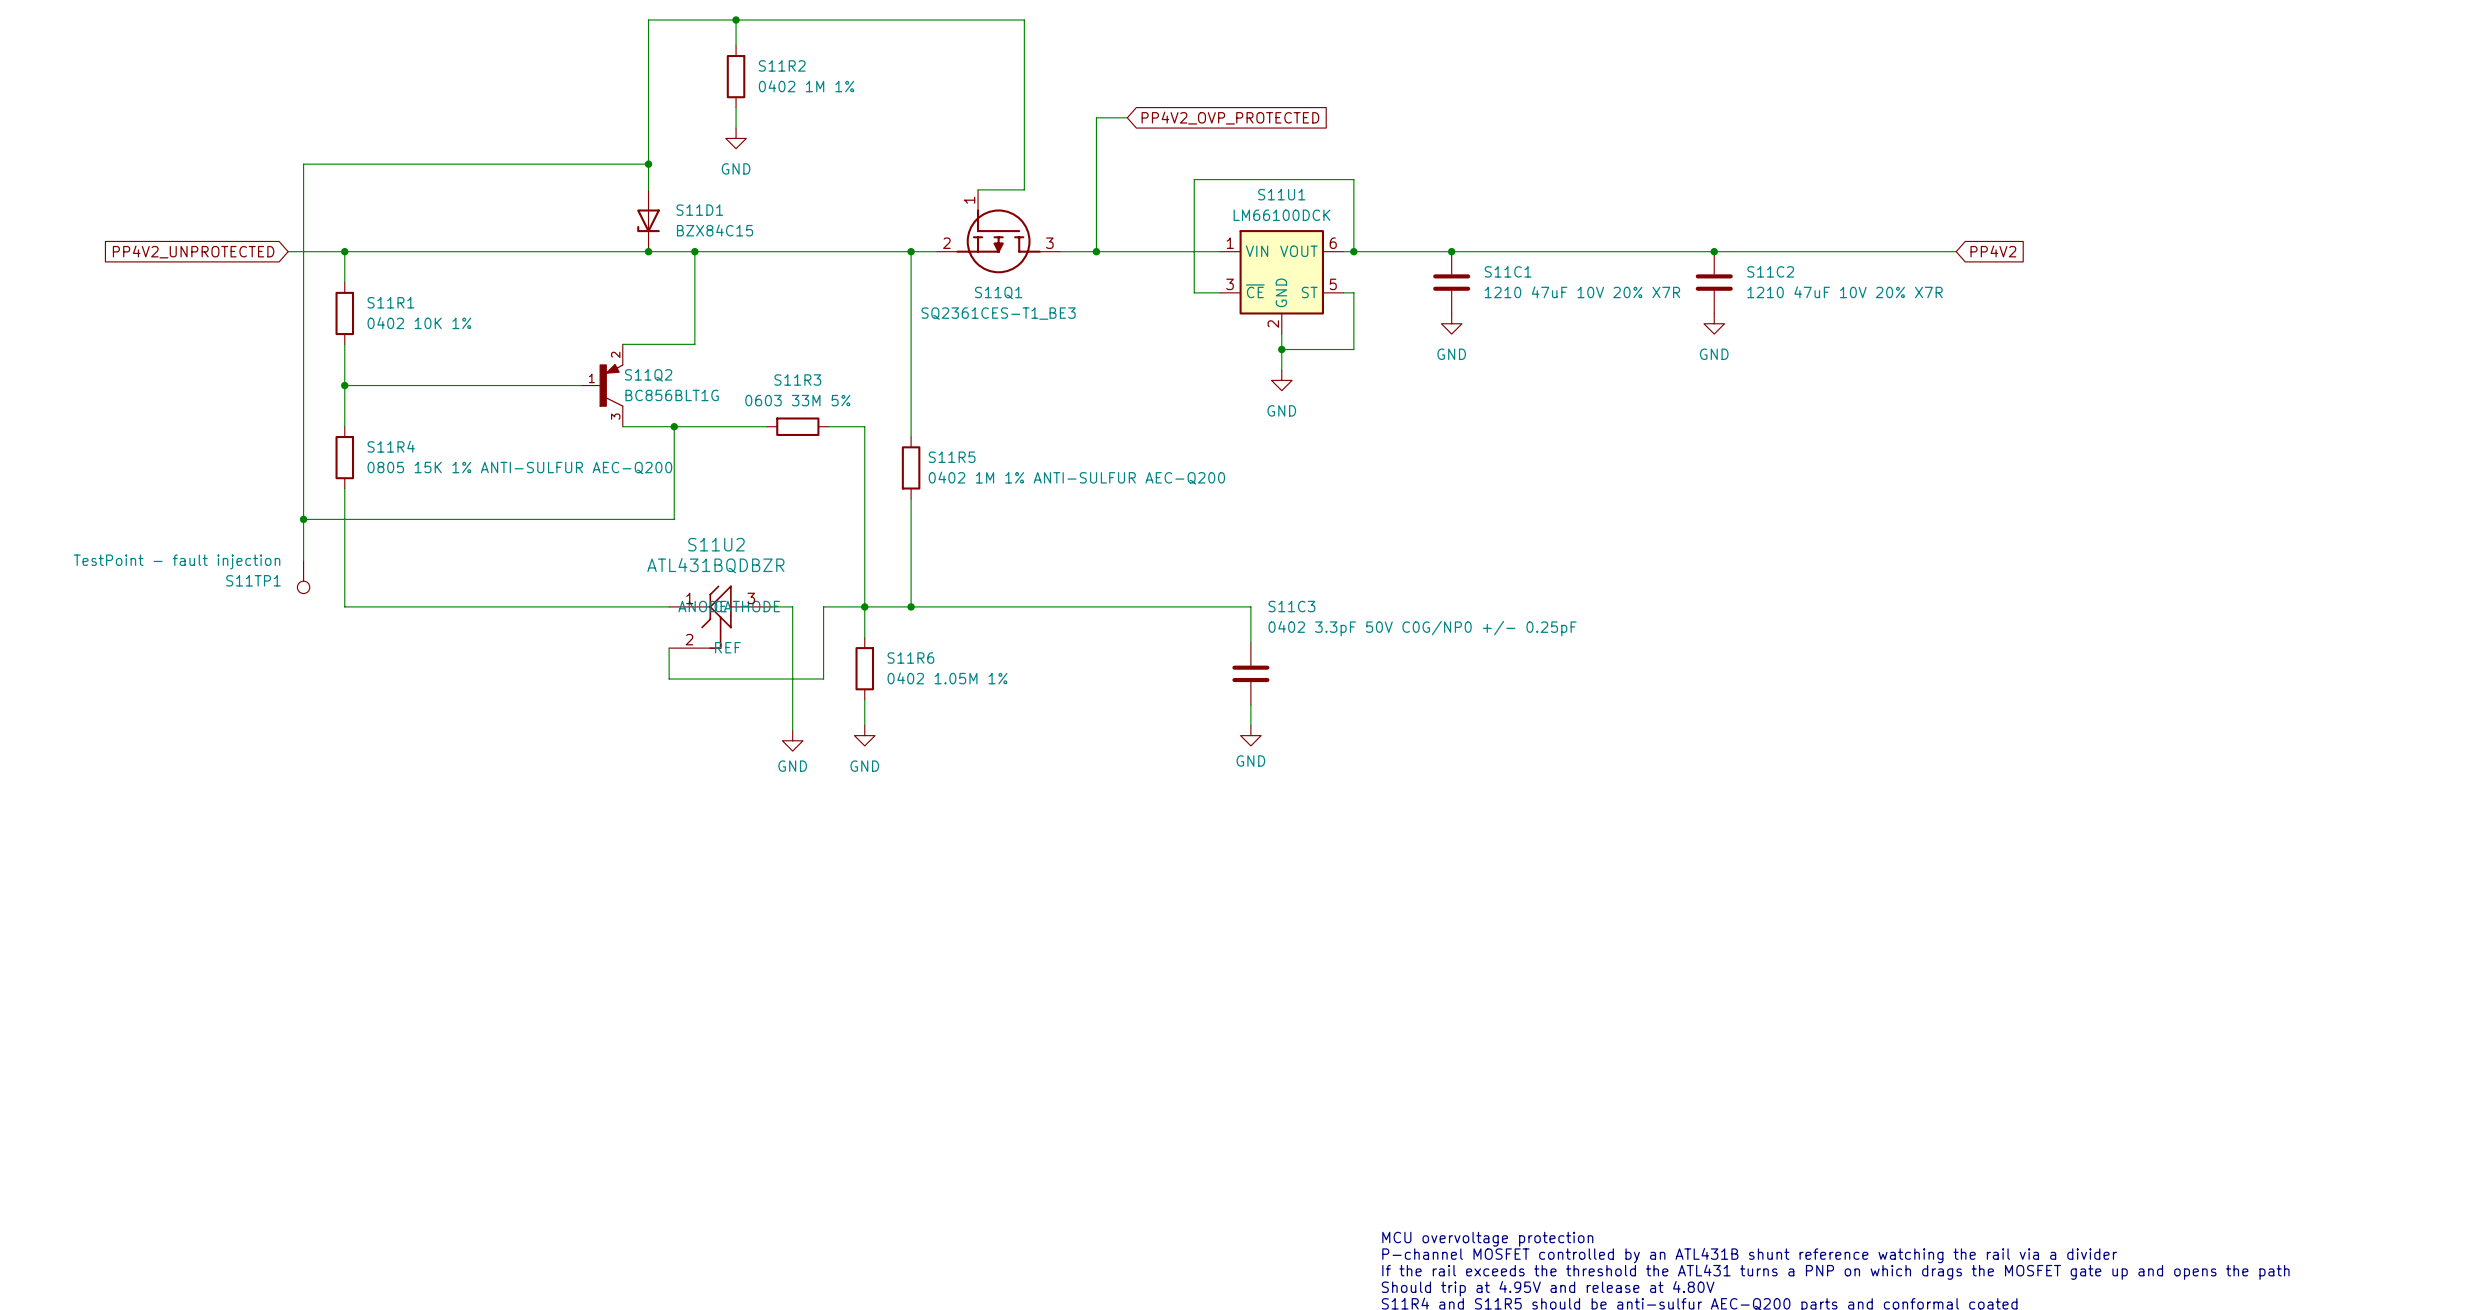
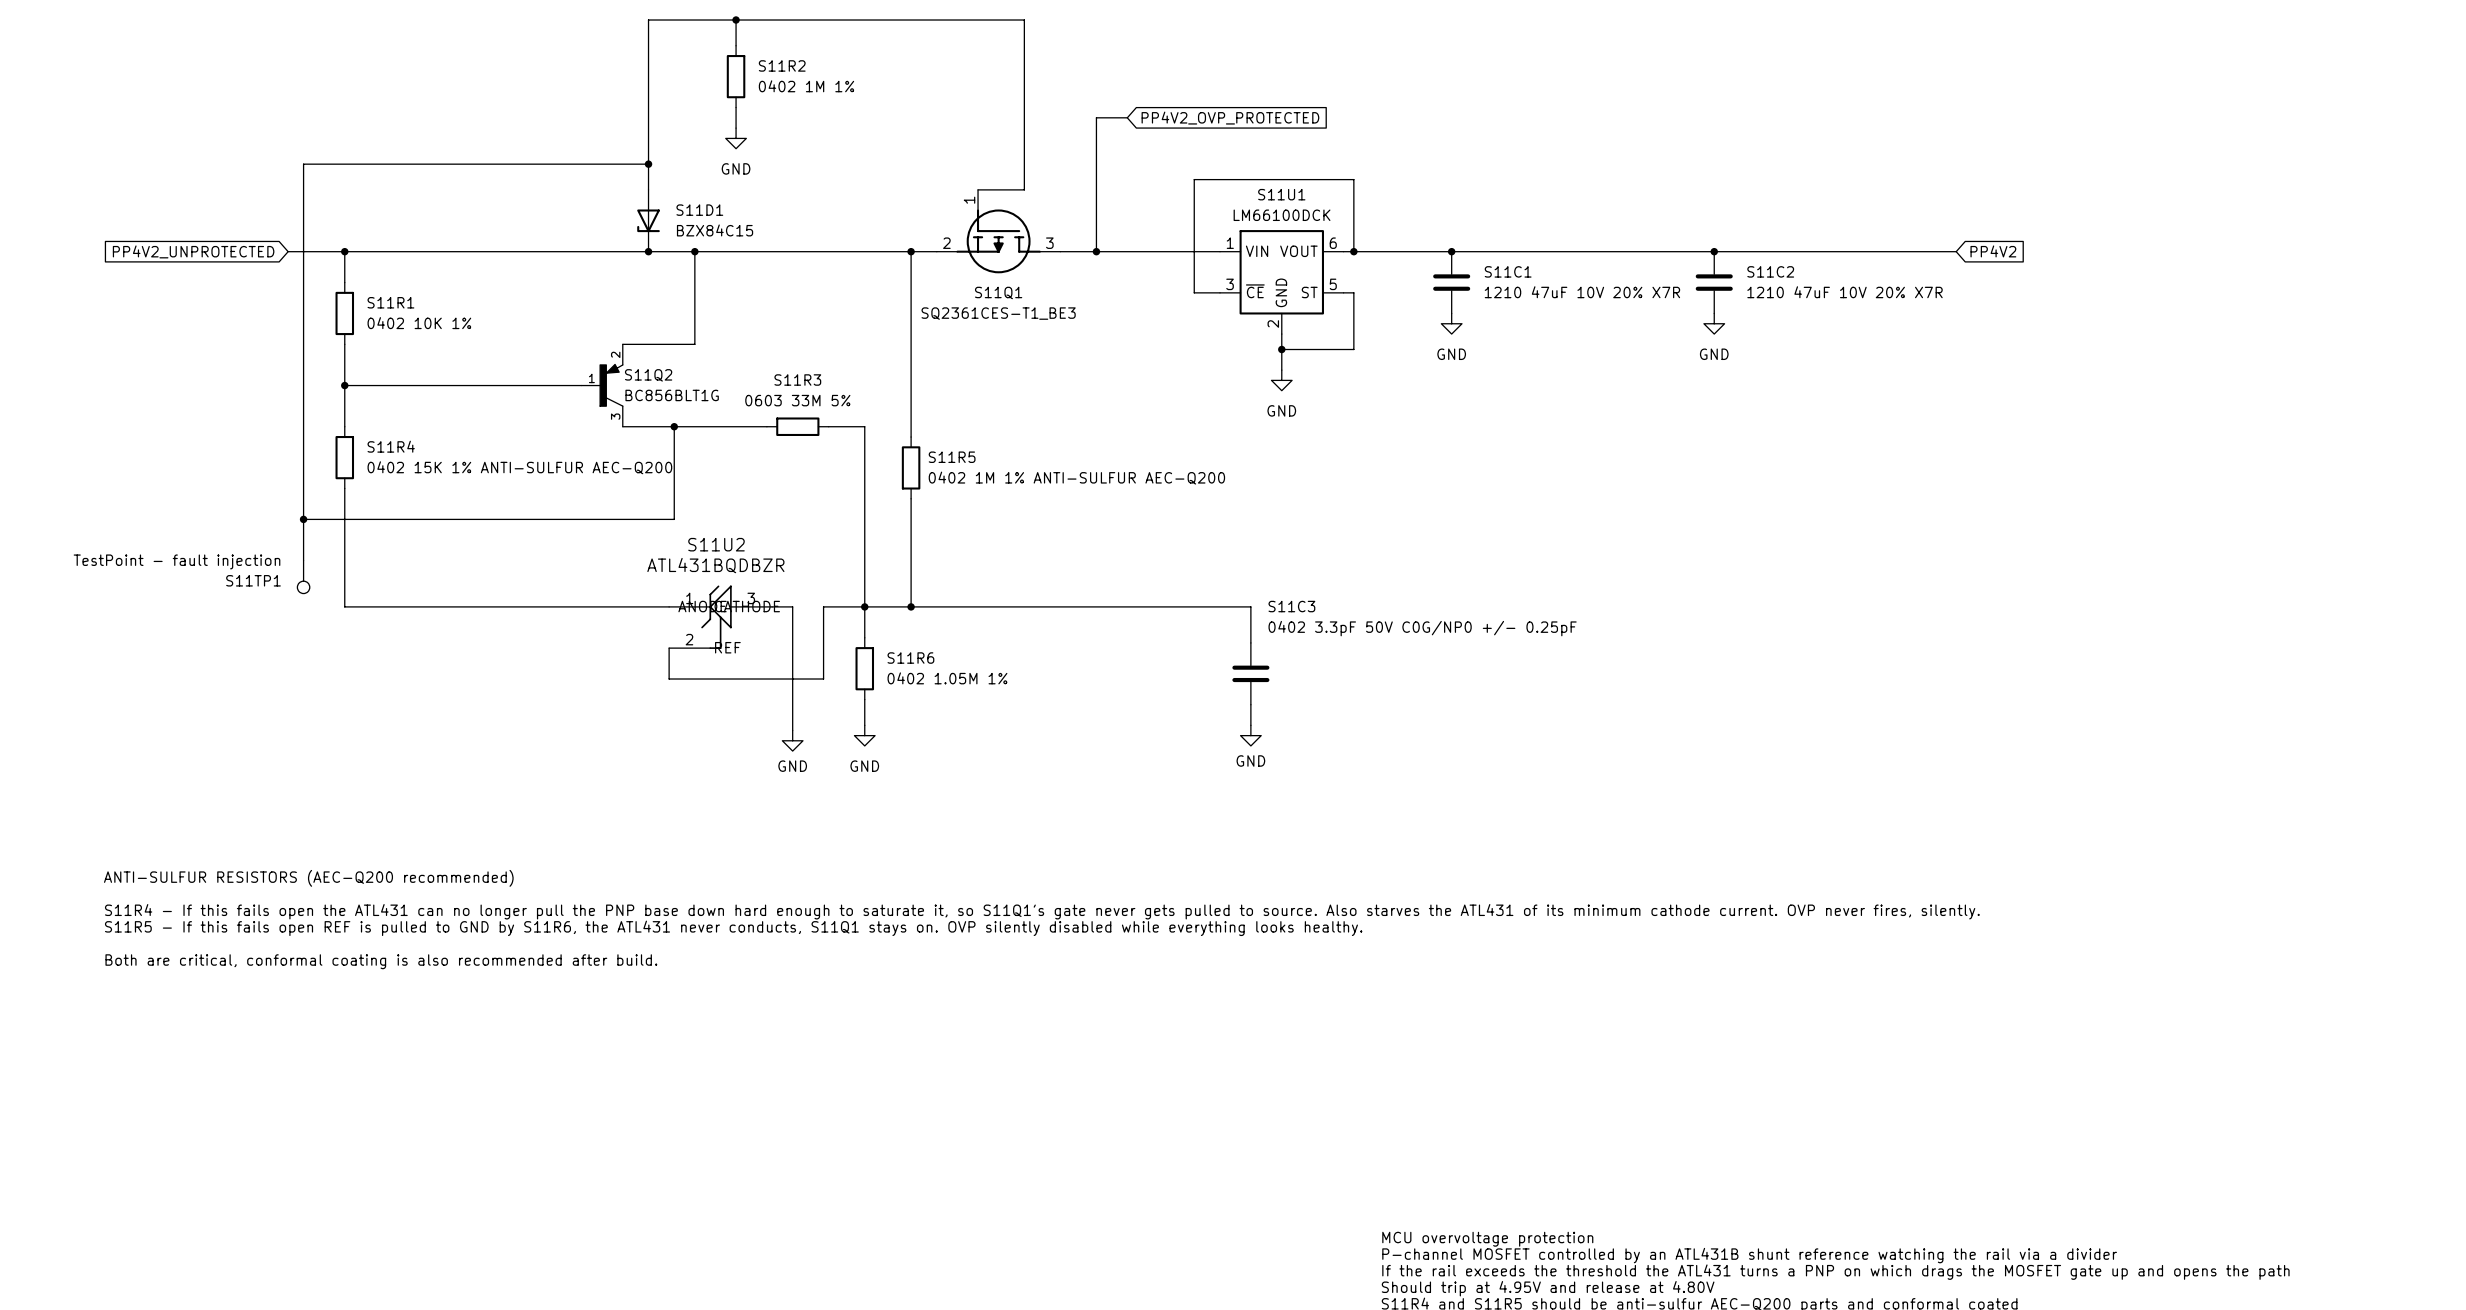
S11R4 value: 0805 15K 1% ANTI-SULFUR AEC-Q200 (519, 468) -> 0402 15K 1% ANTI-SULFUR AEC-Q200 (519, 467)
text: none -> ANTI-SULFUR RESISTORS (AEC-Q200 recommended) (308, 878)
text: none -> S11R4 - If this fails open the ATL431 can no longer pull the PNP base down hard enough to saturate it, so S11Q1's gate never gets pulled to source. Also starves the ATL431 of its minimum cathode current. OVP never fires, silently. (1042, 911)
text: none -> S11R5 - If this fails open REF is pulled to GND by S11R6, the ATL431 never conducts, S11Q1 stays on. OVP silently disabled while everything looks healthy. (733, 928)
text: none -> Both are critical, conformal coating is also recommended after build. (381, 961)

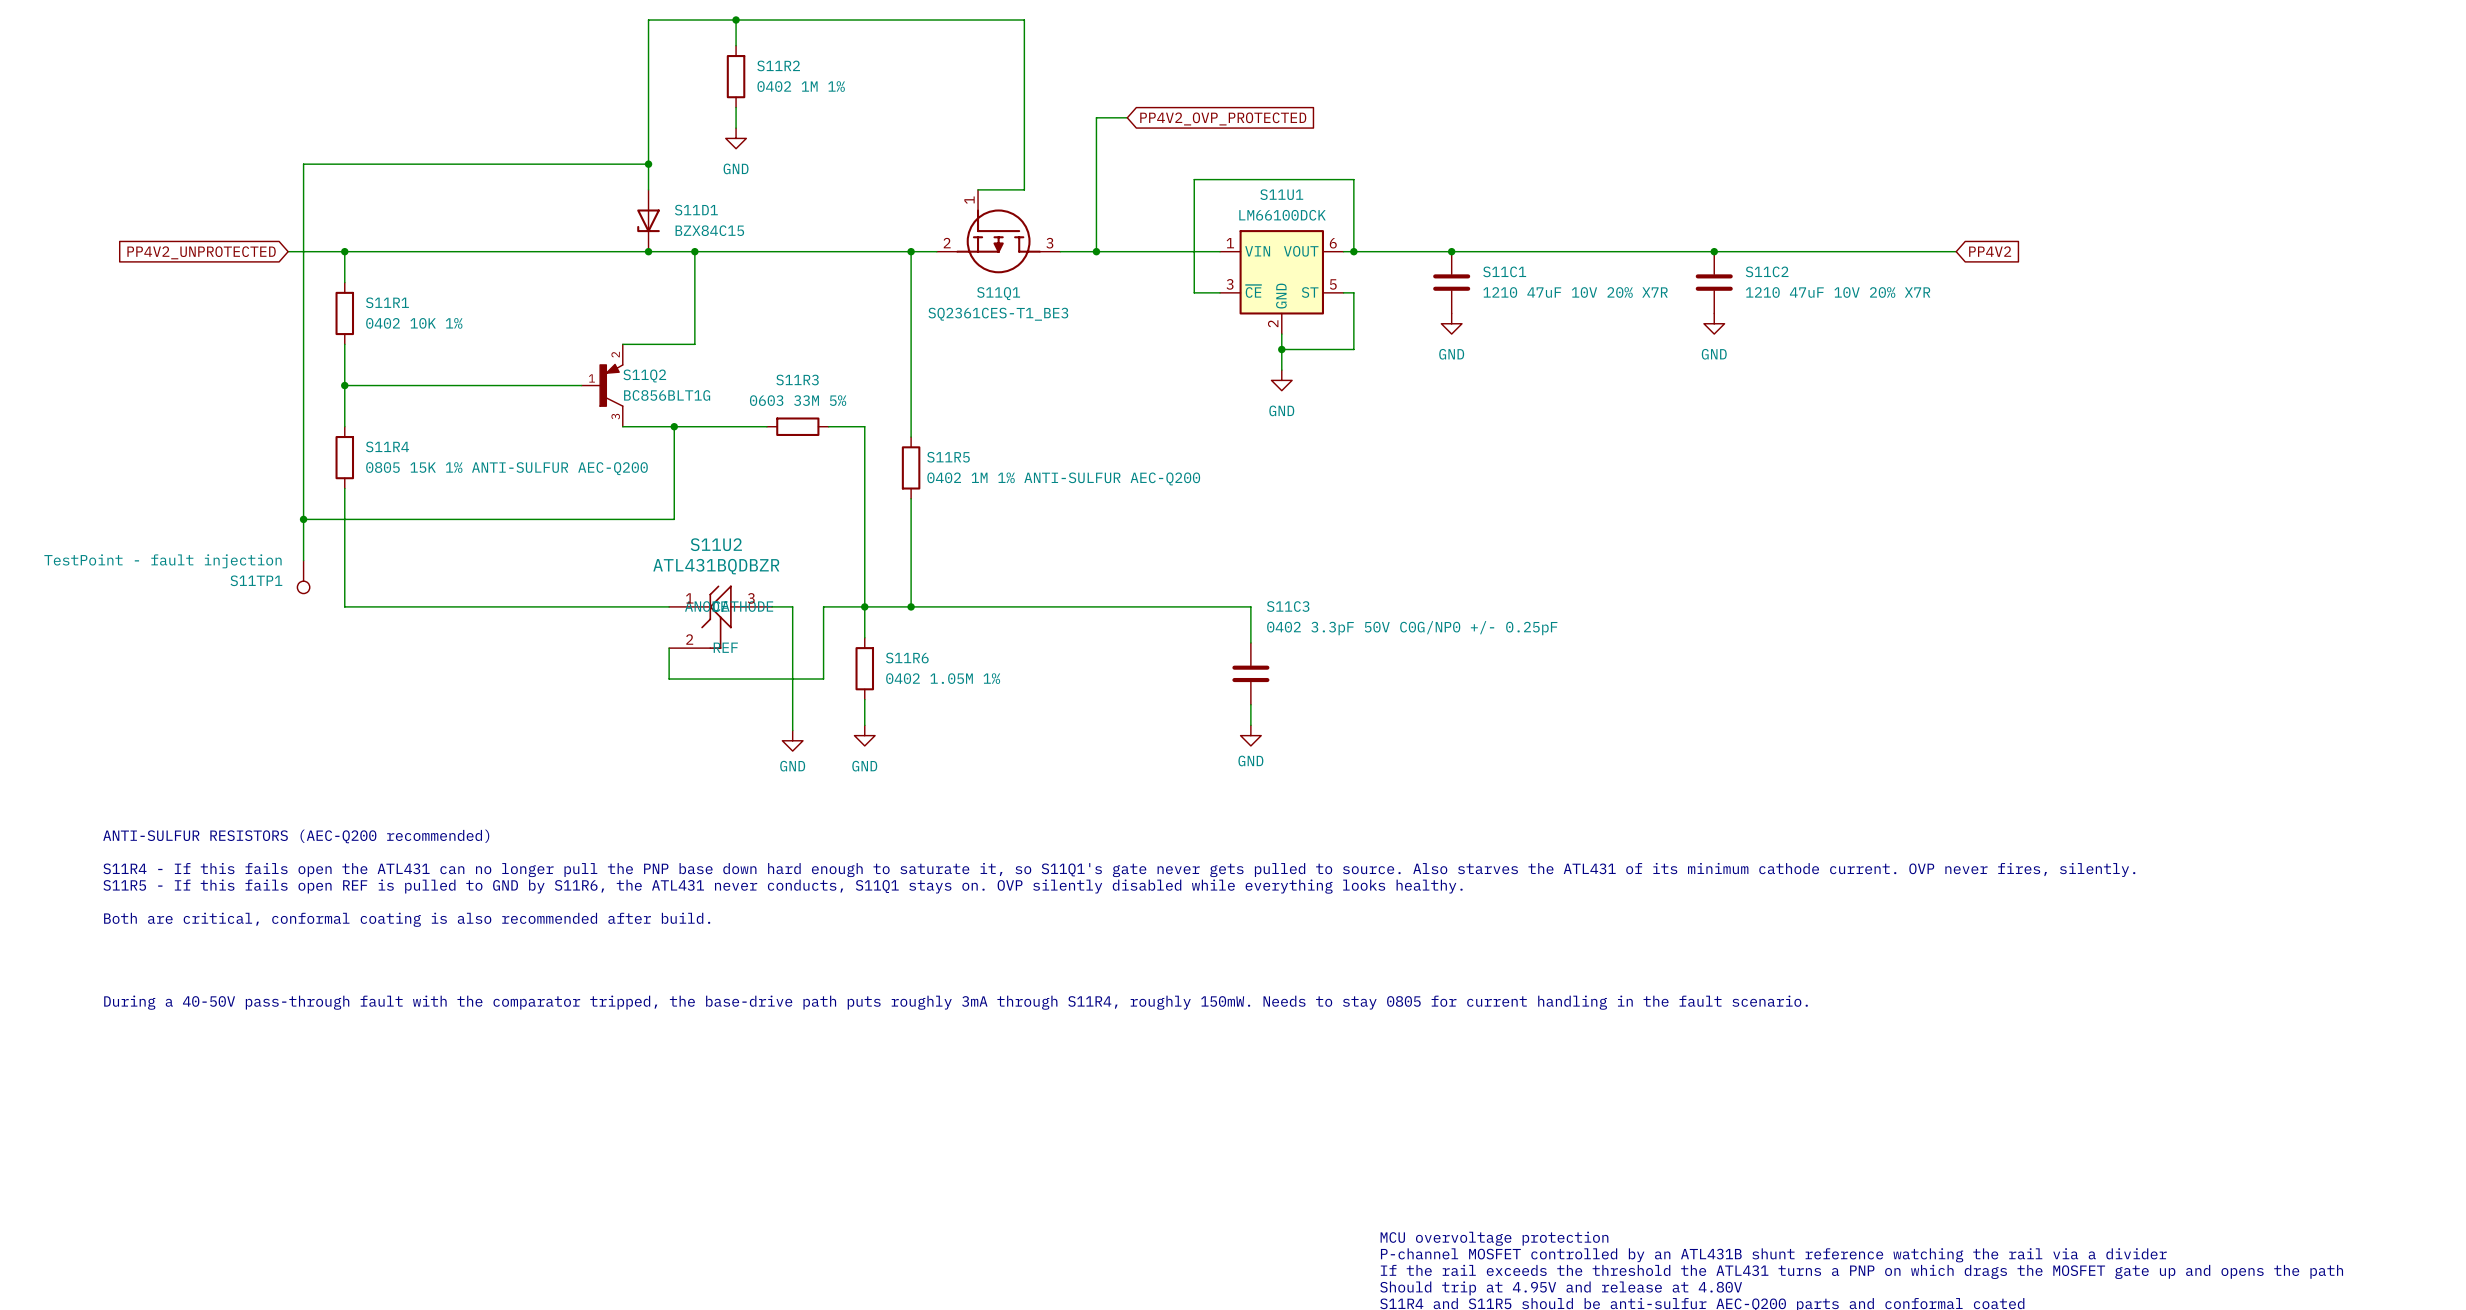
S11R4 value: 0402 15K 1% ANTI-SULFUR AEC-Q200 (519, 467) -> 0805 15K 1% ANTI-SULFUR AEC-Q200 (506, 468)
text position: ANTI-SULFUR RESISTORS (AEC-Q200 recommended) (308, 878) -> ANTI-SULFUR RESISTORS (AEC-Q200 recommended) (296, 836)
text position: S11R4 - If this fails open the ATL431 can no longer pull the PNP base down hard enough to saturate it, so S11Q1's gate never gets pulled to source. Also starves the ATL431 of its minimum cathode current. OVP never fires, silently. (1042, 911) -> S11R4 - If this fails open the ATL431 can no longer pull the PNP base down hard enough to saturate it, so S11Q1's gate never gets pulled to source. Also starves the ATL431 of its minimum cathode current. OVP never fires, silently. (1119, 870)
text position: S11R5 - If this fails open REF is pulled to GND by S11R6, the ATL431 never conducts, S11Q1 stays on. OVP silently disabled while everything looks healthy. (733, 928) -> S11R5 - If this fails open REF is pulled to GND by S11R6, the ATL431 never conducts, S11Q1 stays on. OVP silently disabled while everything looks healthy. (783, 886)
text position: Both are critical, conformal coating is also recommended after build. (381, 961) -> Both are critical, conformal coating is also recommended after build. (407, 919)
text: none -> During a 40-50V pass-through fault with the comparator tripped, the base-drive path puts roughly 3mA through S11R4, roughly 150mW. Needs to stay 0805 for current handling in the fault scenario. (956, 1002)

